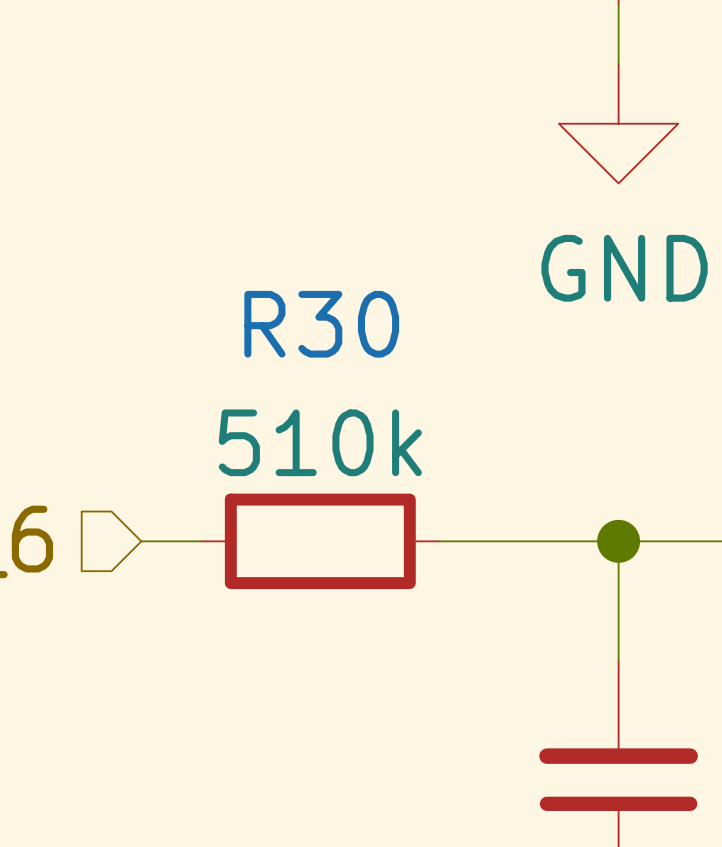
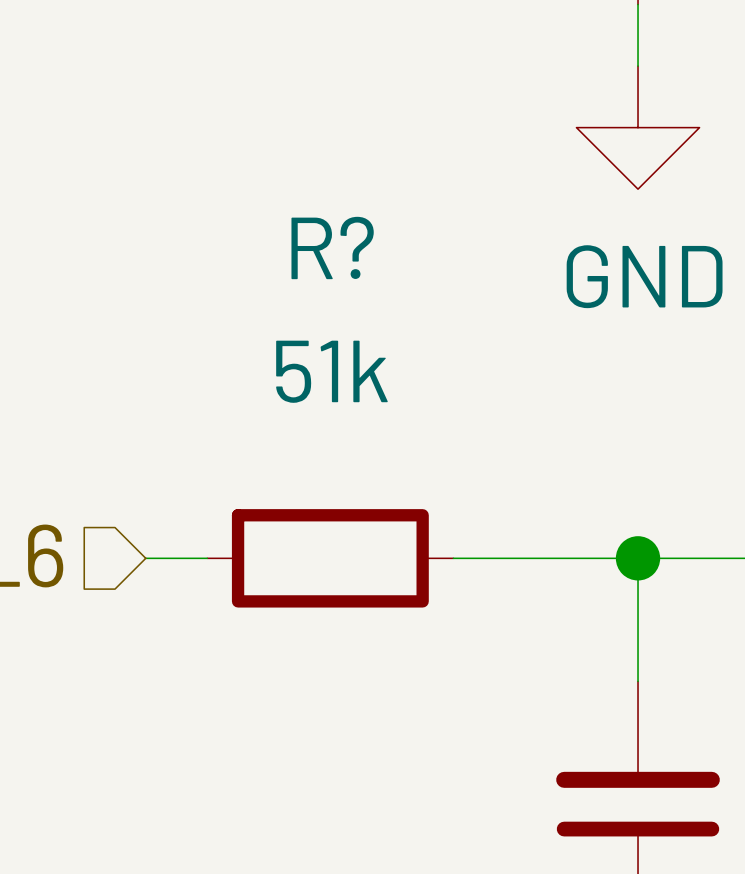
R30 name: R30 (321, 324) -> R? (332, 247)
R30 text: 510k (320, 442) -> 51k (331, 371)

